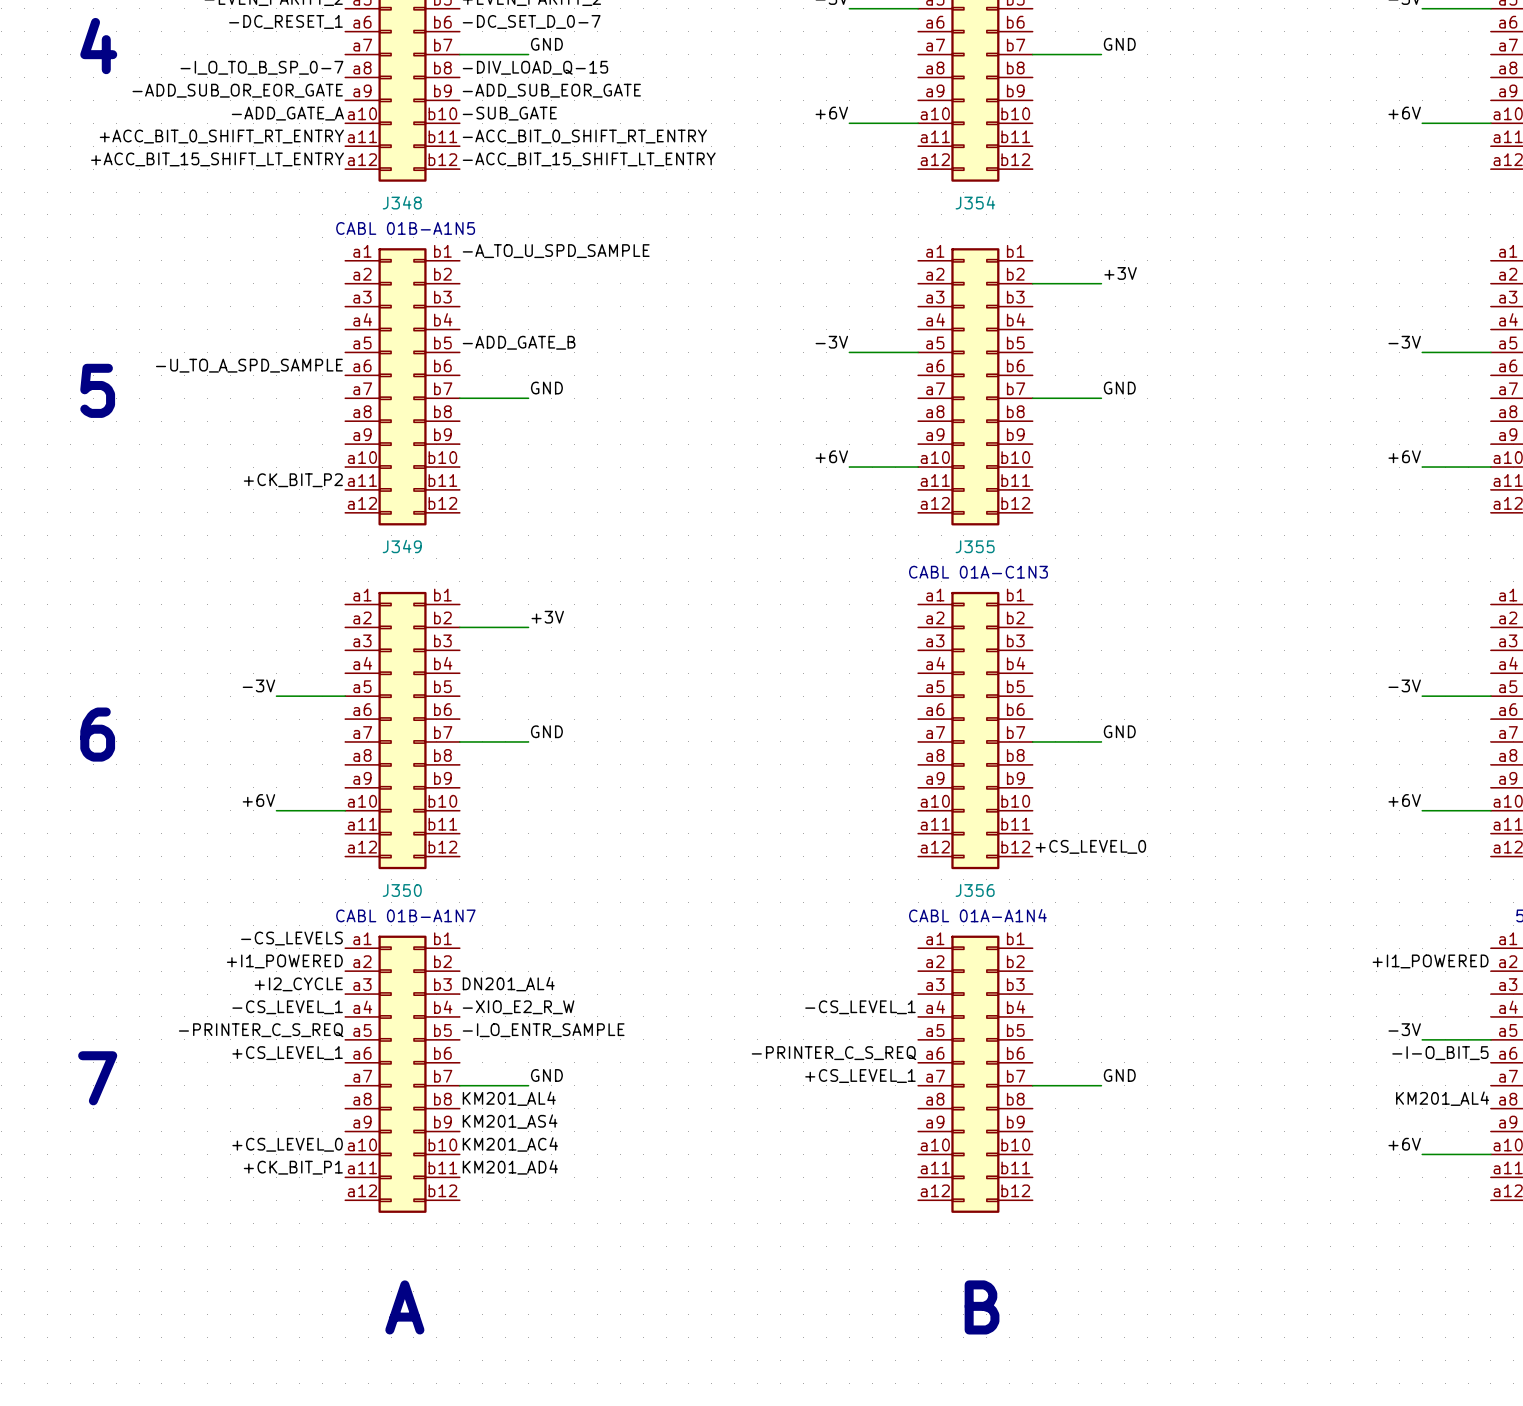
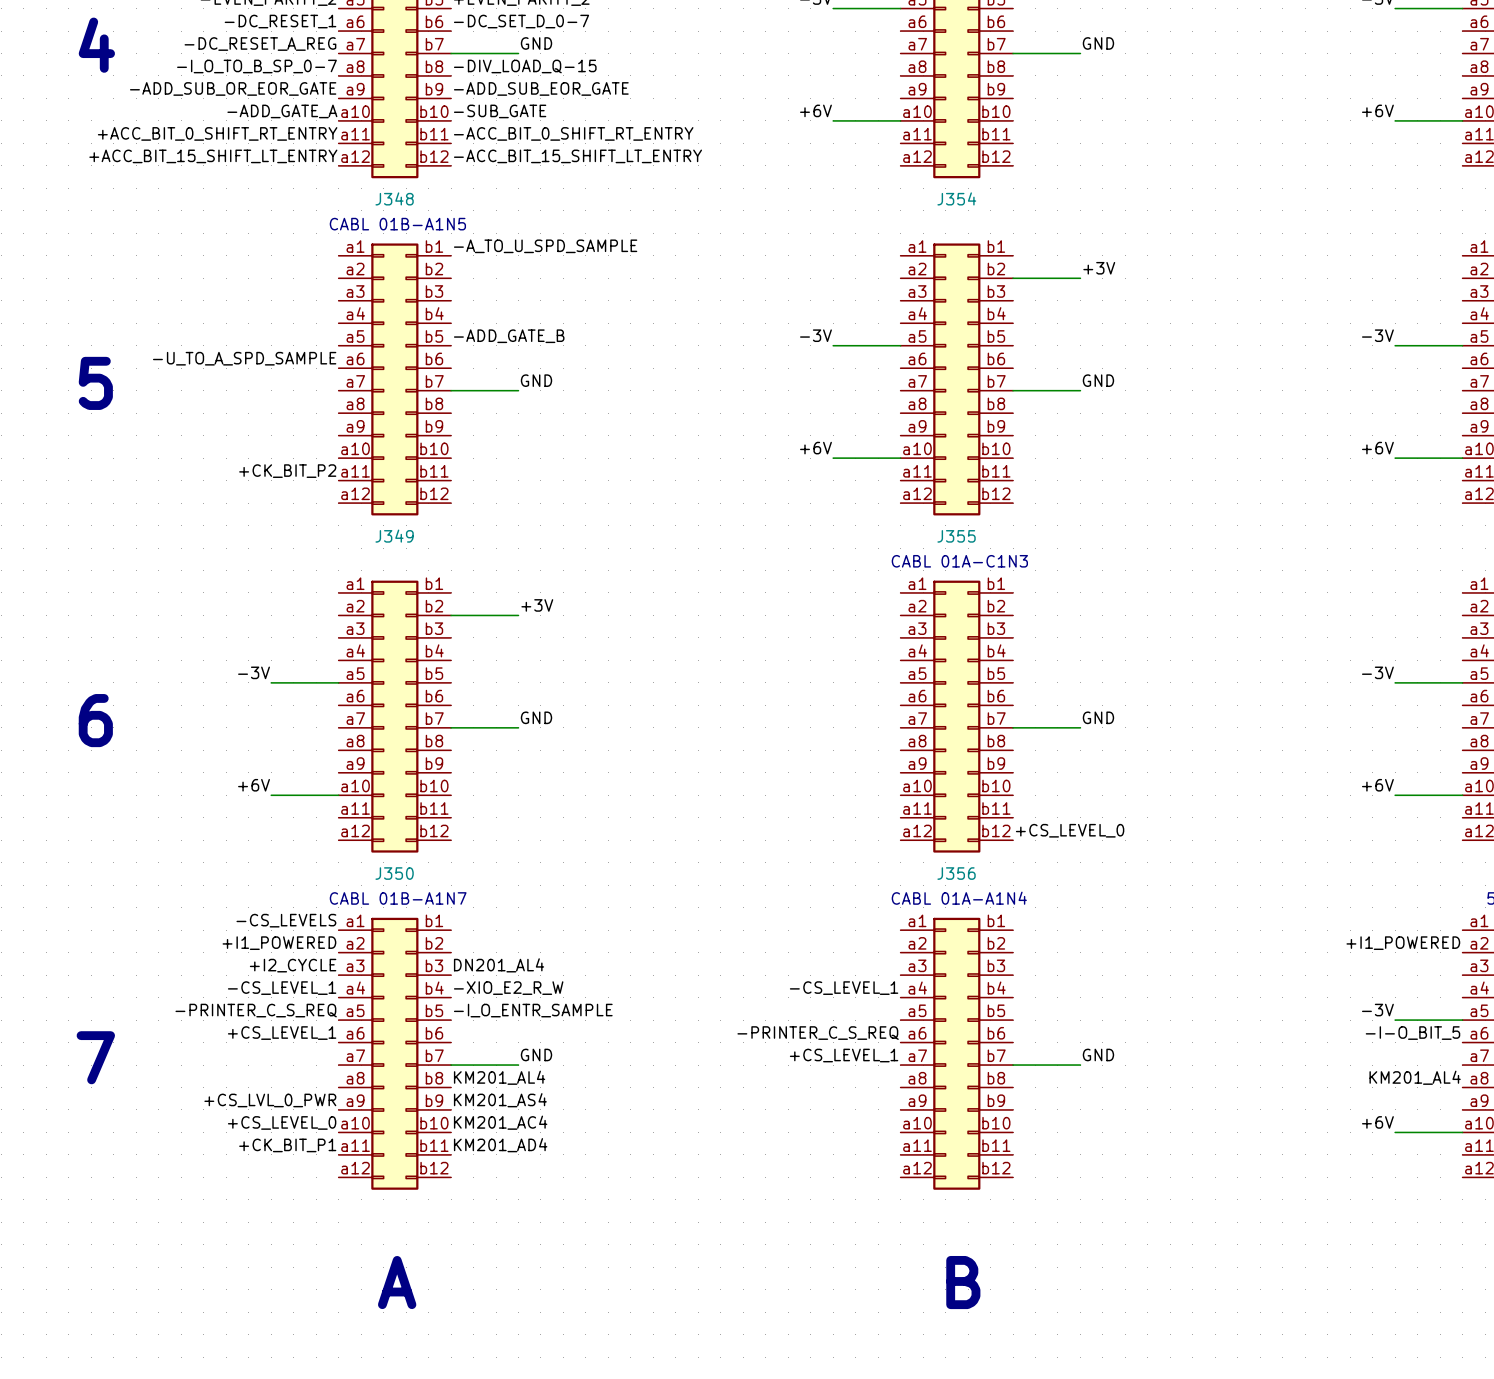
label: none -> -DC_RESET_A_REG (260, 44)
label: none -> +CS_LVL_0_PWR (270, 1100)

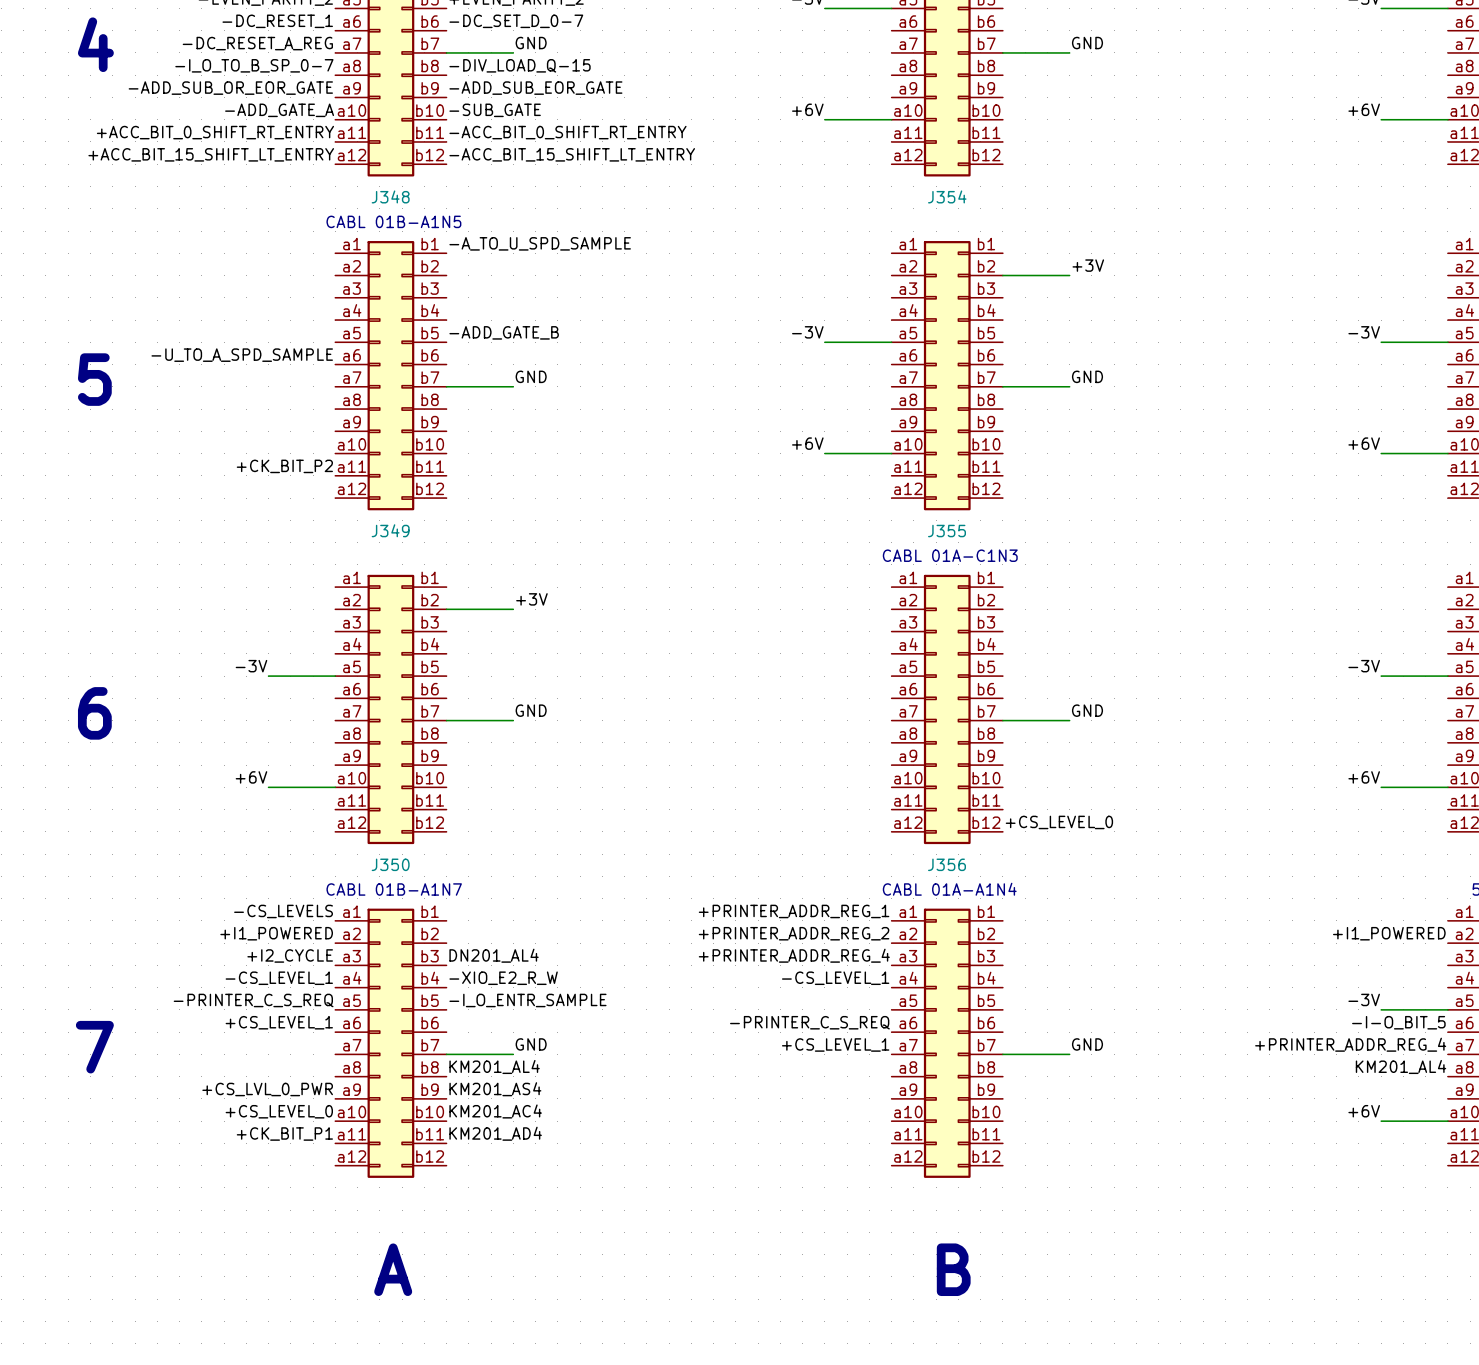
label: none -> +PRINTER_ADDR_REG_1 (794, 911)
label: none -> +PRINTER_ADDR_REG_2 (794, 933)
label: none -> +PRINTER_ADDR_REG_4 (794, 955)
label: none -> +PRINTER_ADDR_REG_4 (1350, 1044)

